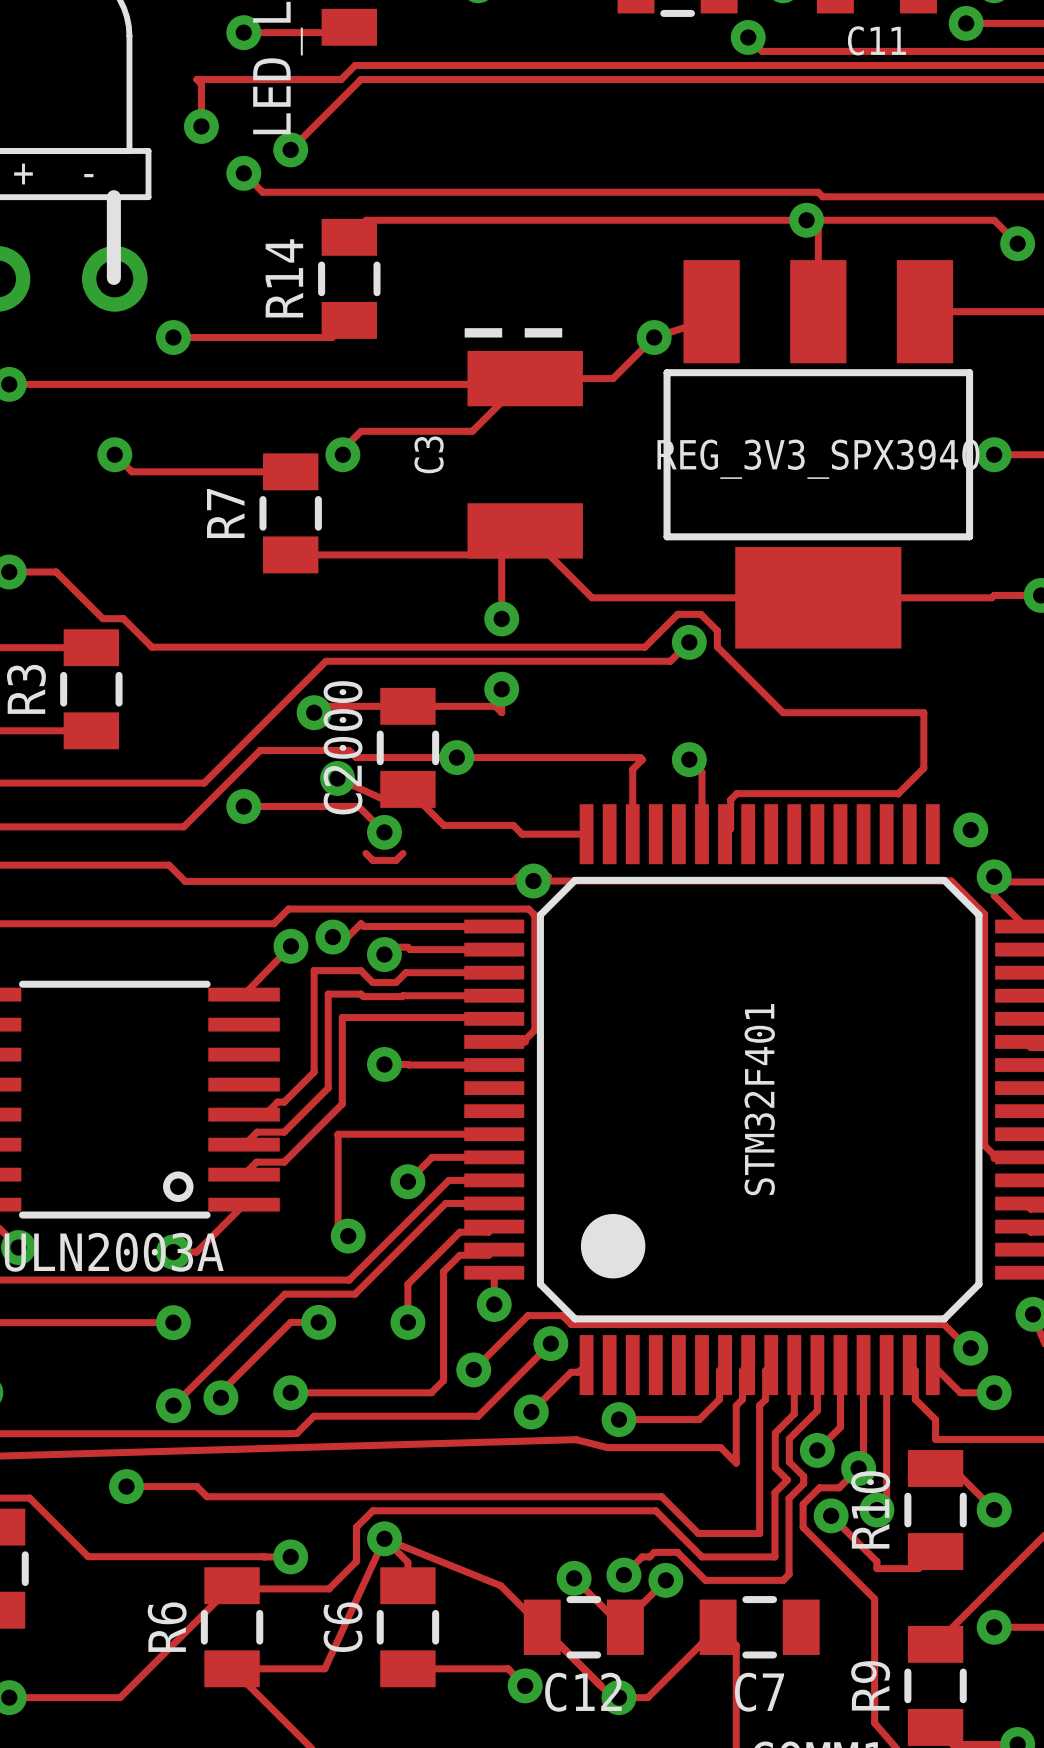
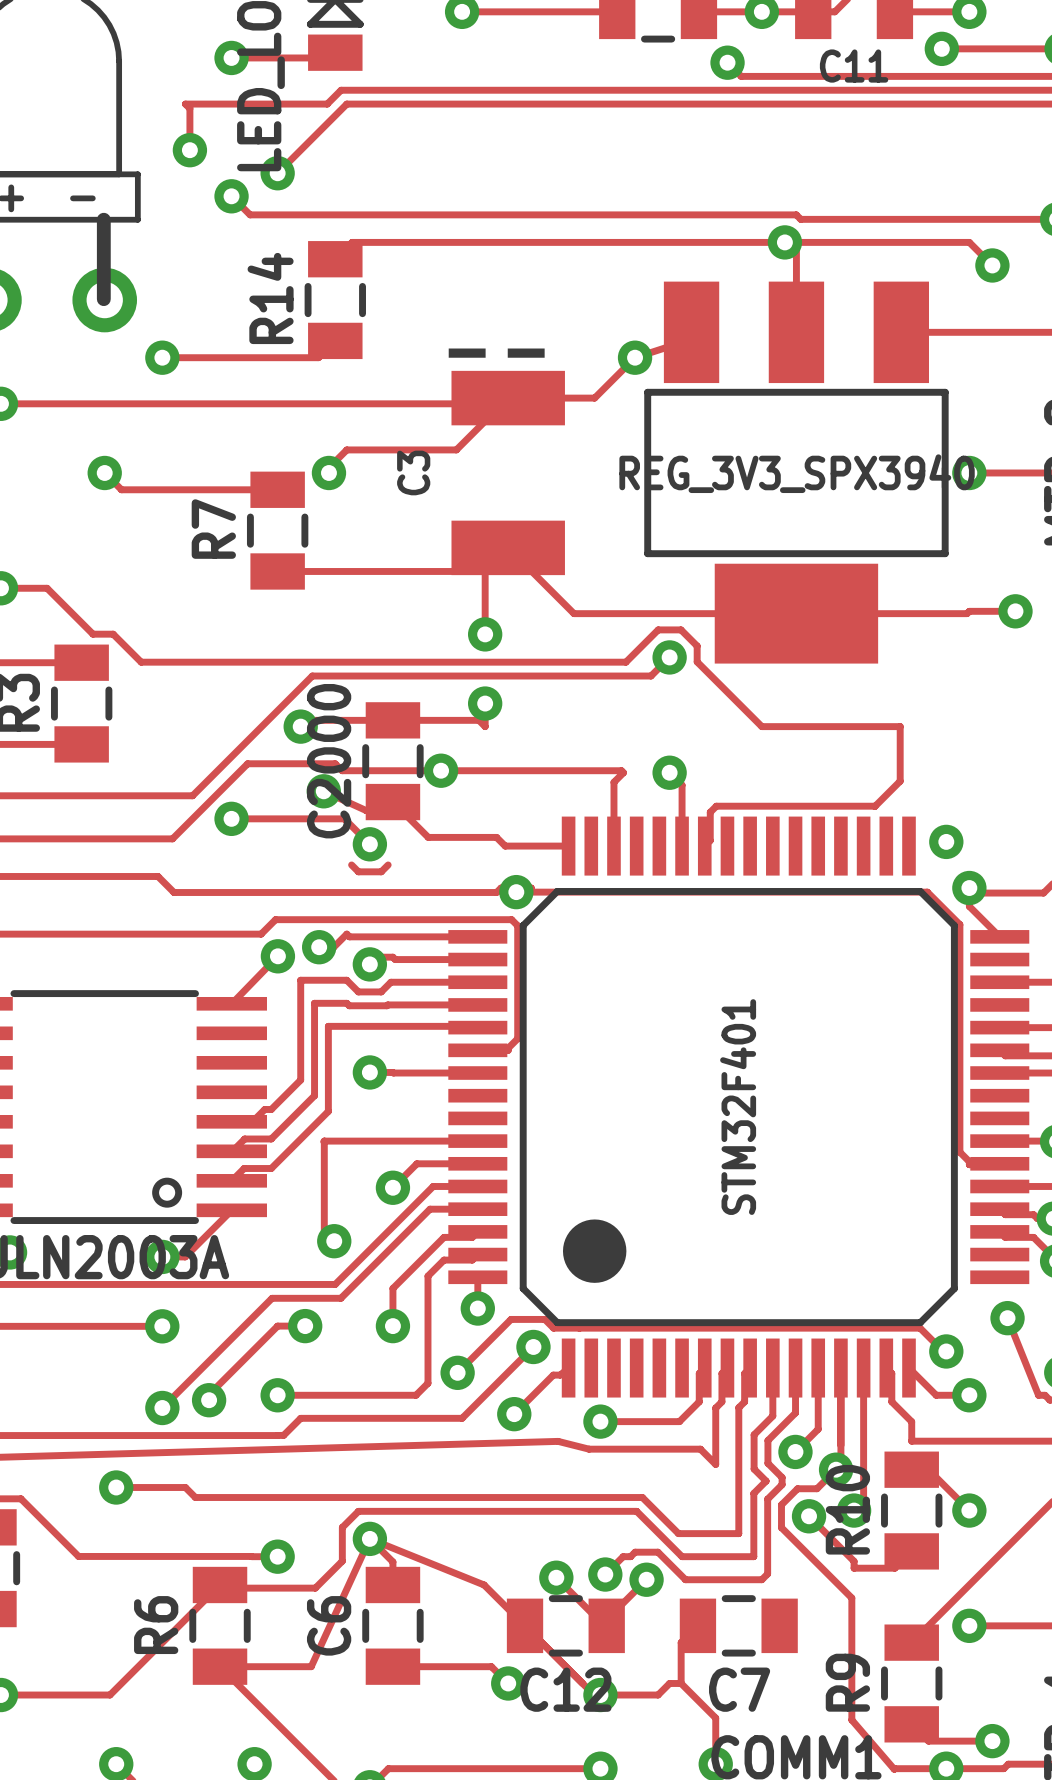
track: (718, 1627) (736, 1645) (736, 1721) -> (681, 1683) (715, 1718)
track: (701, 1644) (647, 1697) -> (681, 1683) (669, 1683) (658, 1695) (628, 1695)
track: none -> (681, 1642) (681, 1683)

